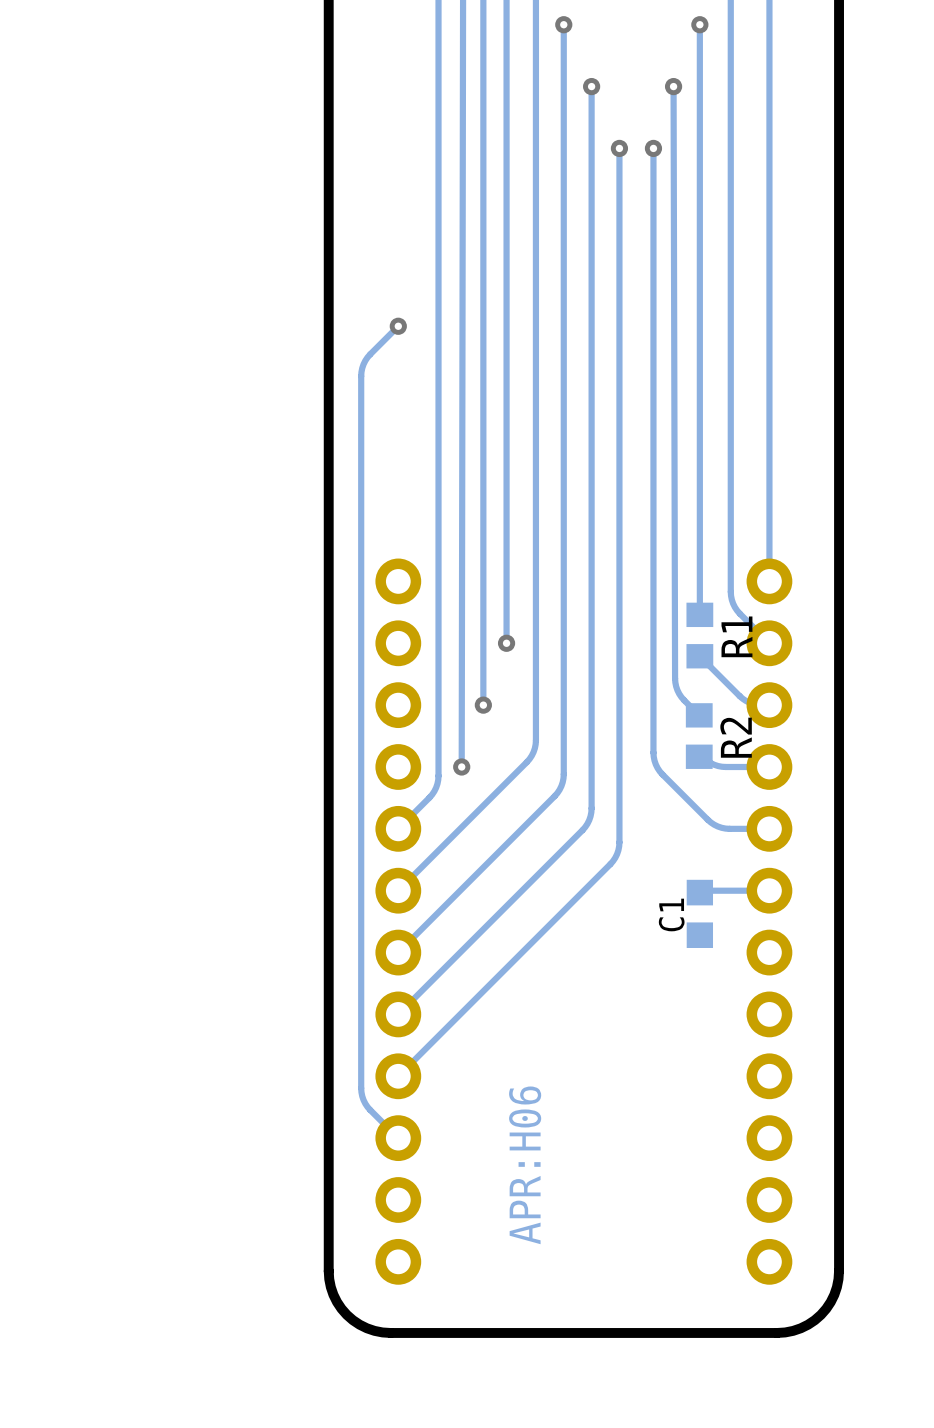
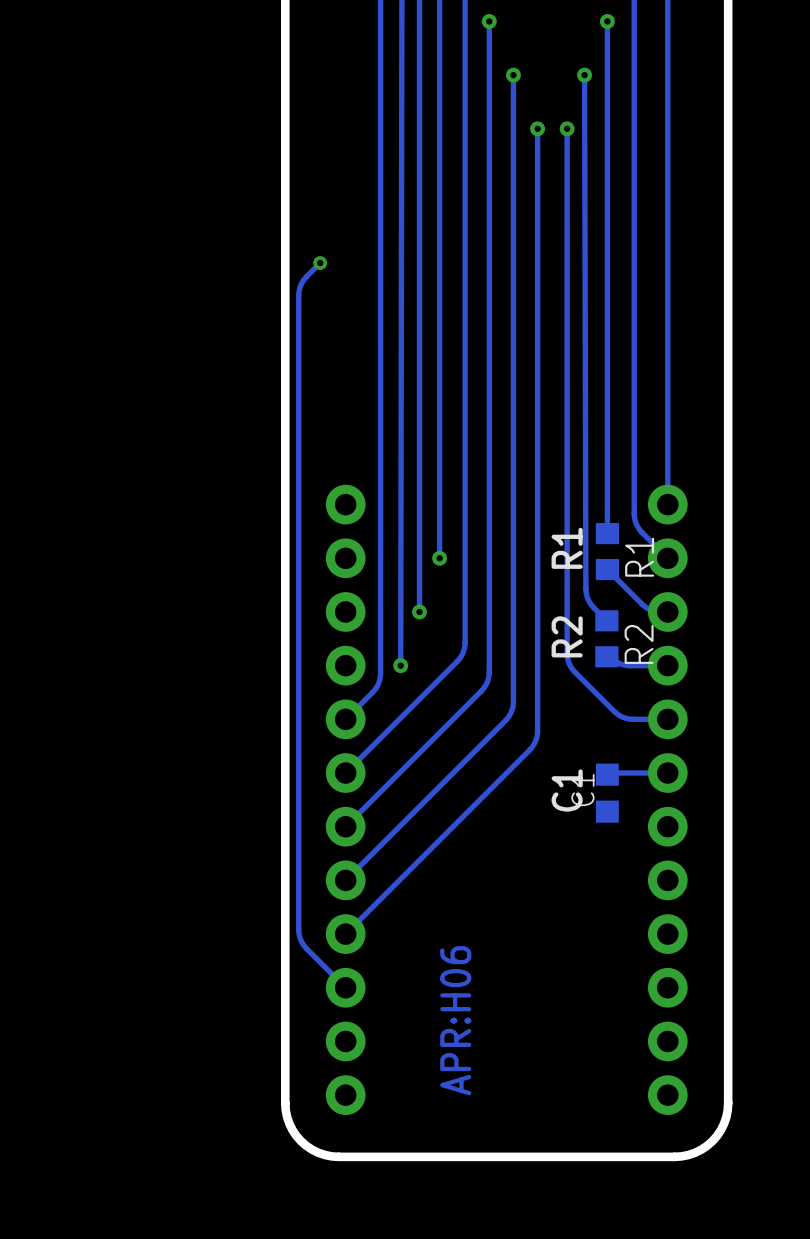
via: none -> (320, 263)
track: (398, 326) (367, 357) (362, 368) (361, 376) (361, 1088) (363, 1100) (370, 1110) -> (320, 263) (302, 282) (298, 295) (298, 929) (304, 946) (321, 963)
via: (398, 326) -> none
text: none -> R1 (567, 548)
text: none -> R2 (567, 636)
text: none -> C1 (567, 790)

